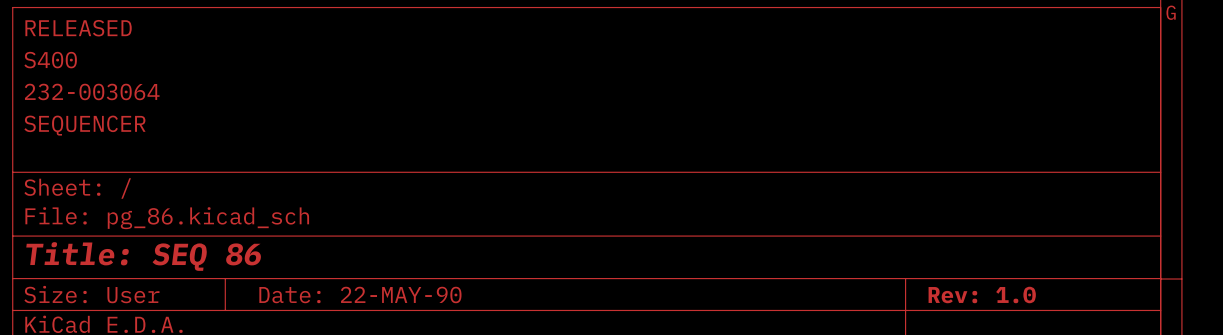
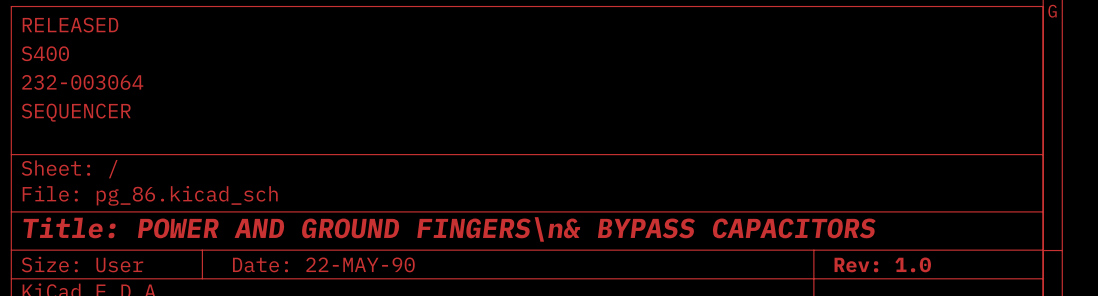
title block: Title: SEQ 86 (143, 256) -> Title: POWER AND GROUND FINGERS\n& BYPASS CAPACITORS (449, 229)

